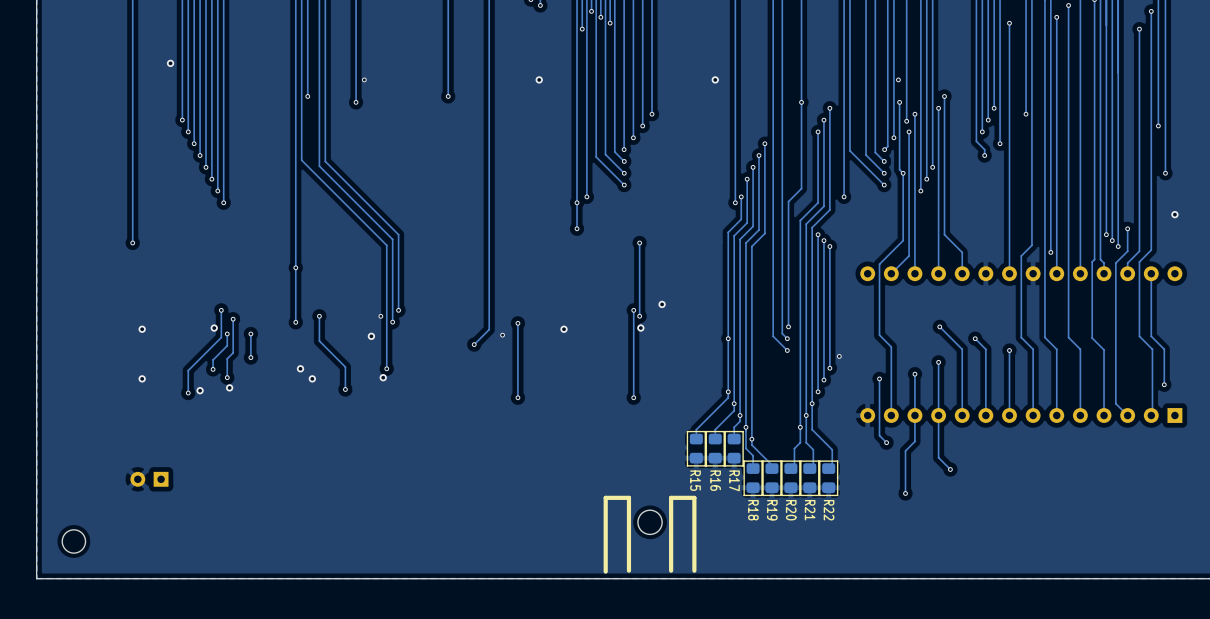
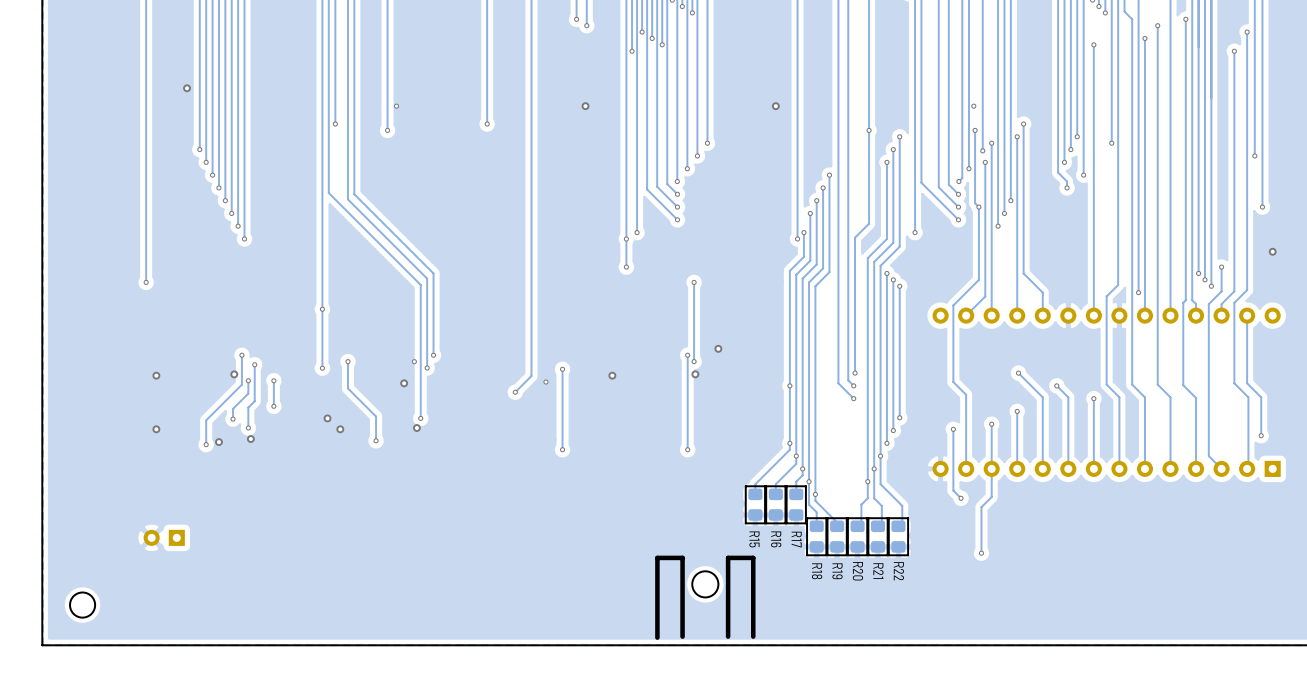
via: (839, 356) -> none
track: (938, 415) (938, 457) (950, 469) -> none
via: (950, 469) -> none

